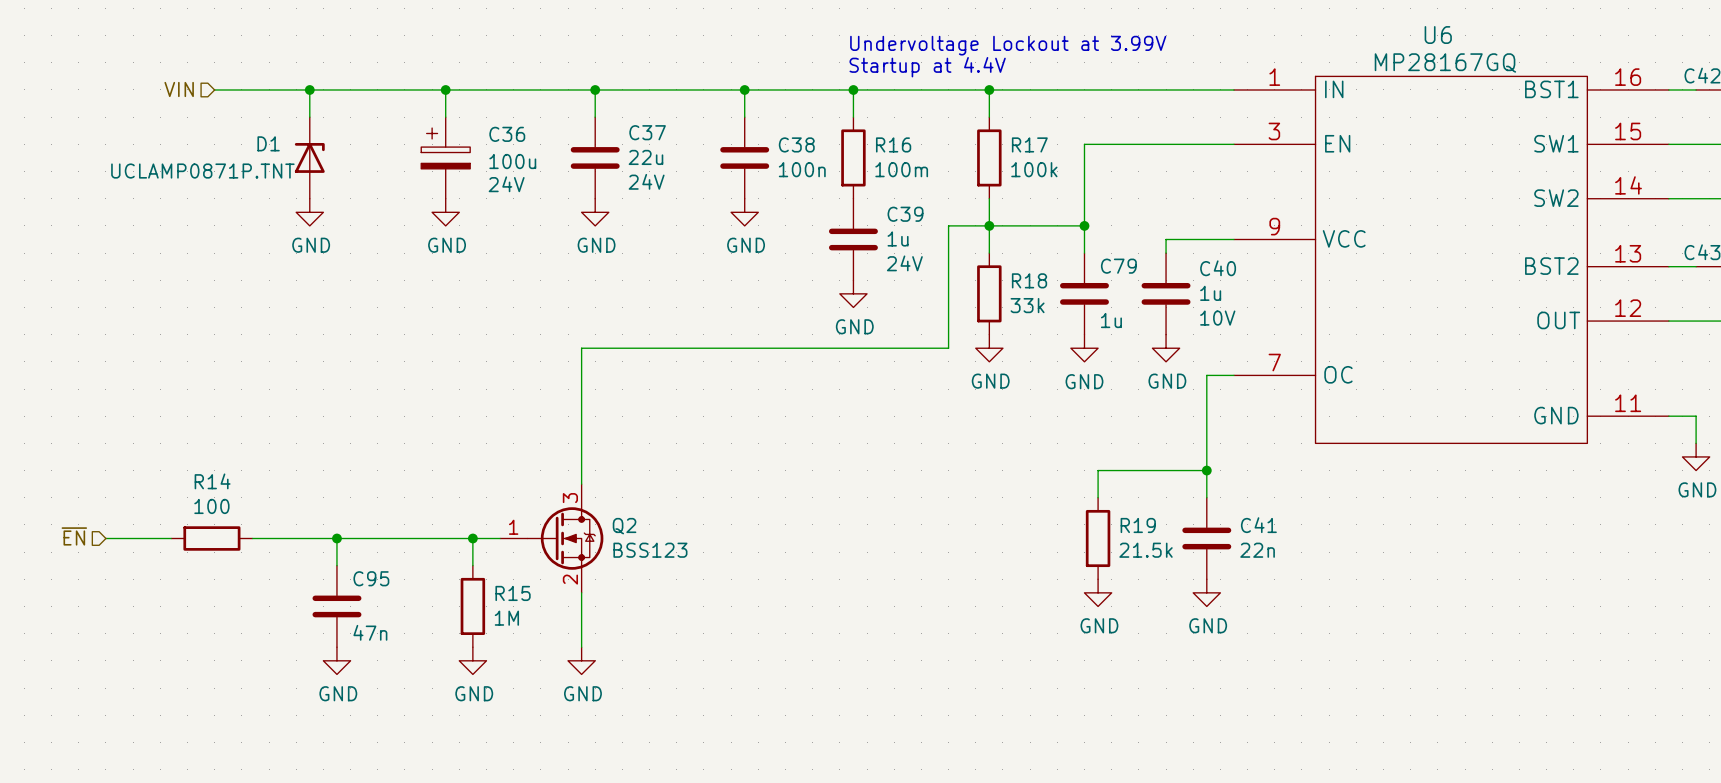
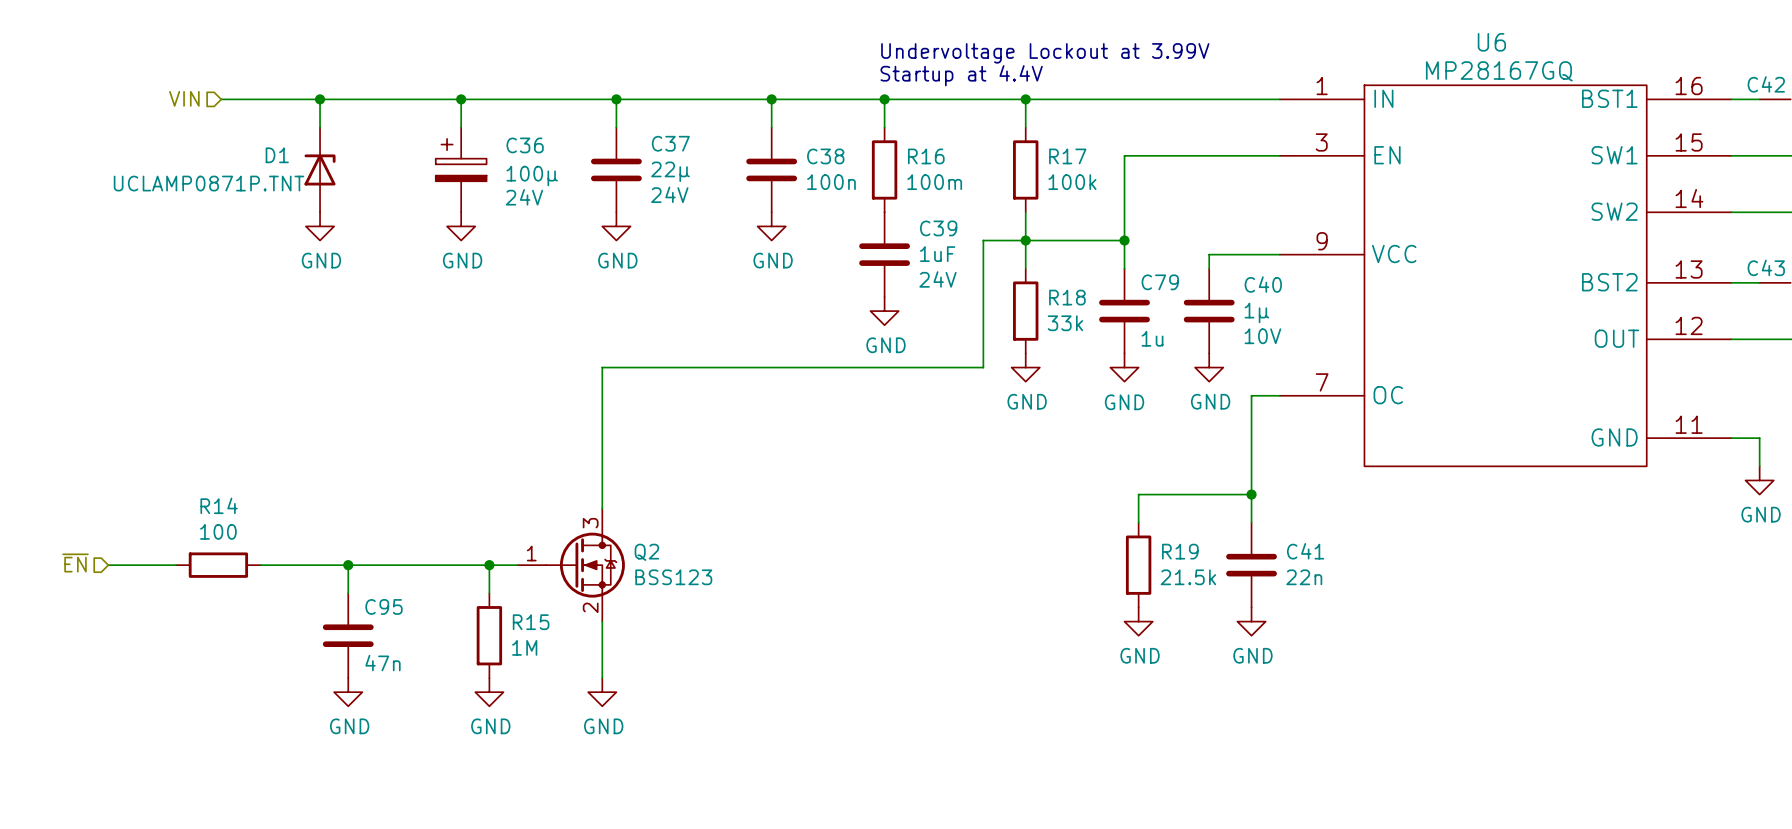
C37 value: 22u (645, 157) -> 22µ (670, 171)
C36 value: 100u (512, 161) -> 100µ (532, 176)
C39 value: 1u (898, 238) -> 1uF (937, 254)
C40 value: 1u (1210, 293) -> 1µ (1256, 312)

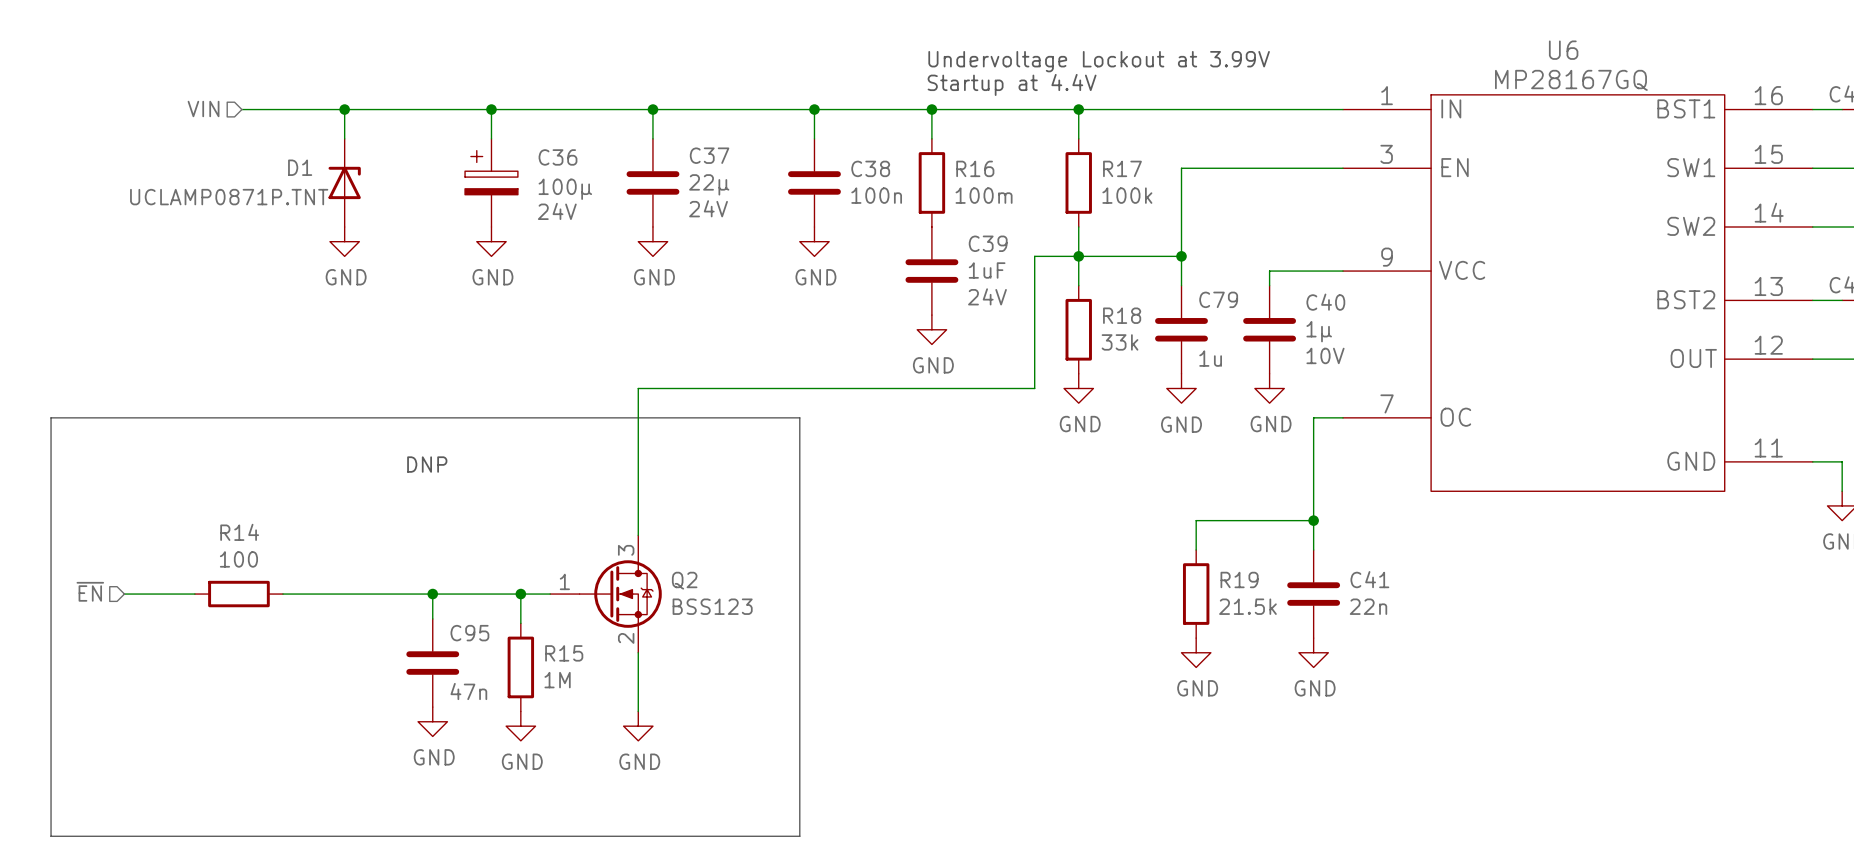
line: none -> (51, 417) (799, 417) (799, 836) (51, 836) (51, 417)
text: none -> DNP (427, 464)
wire: (348, 565) (348, 593) -> none
junction position: (348, 565) -> (432, 594)
wire: none -> (432, 594) (432, 618)
C95 position: (348, 635) -> (432, 663)
power symbol position: GND (348, 692) -> GND (432, 721)

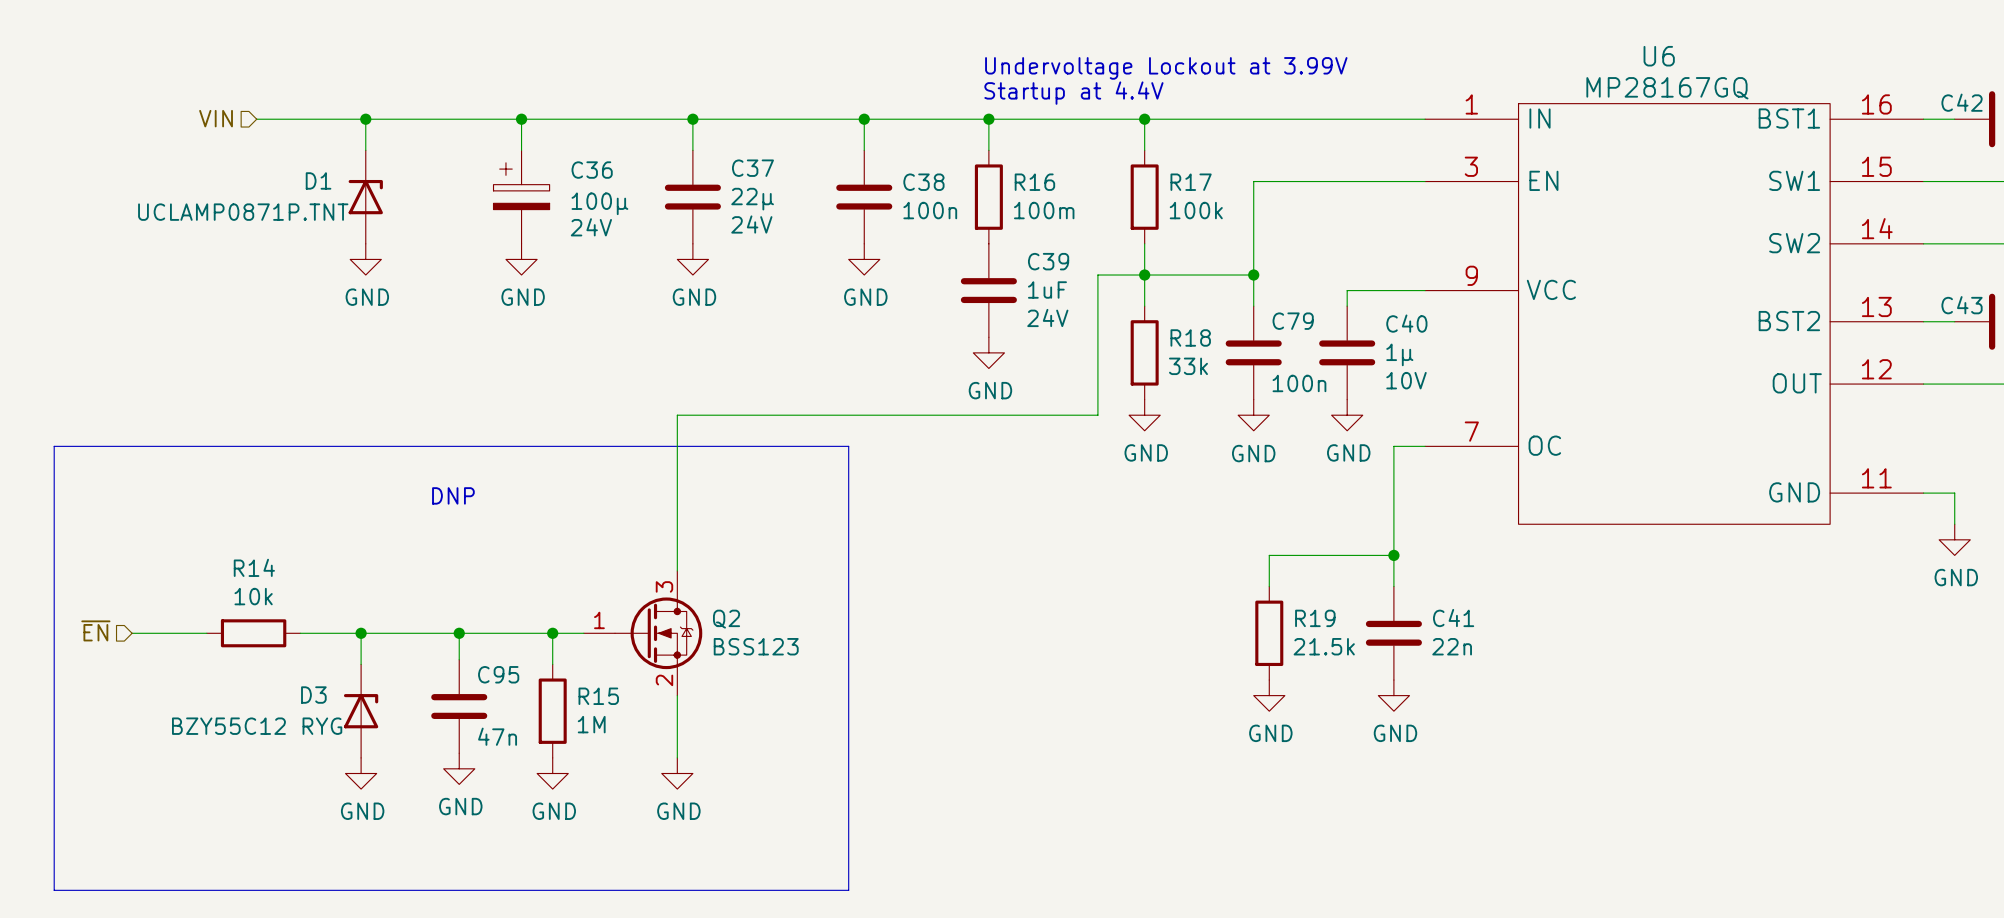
C79 value: 1u (1210, 358) -> 100n (1299, 383)
R14 value: 100 (238, 559) -> 10k (253, 596)
wire: none -> (361, 633) (361, 664)
junction: none -> (361, 633)
D3: none -> BZY55C12 RYG (361, 711)
power symbol: none -> GND (361, 773)

